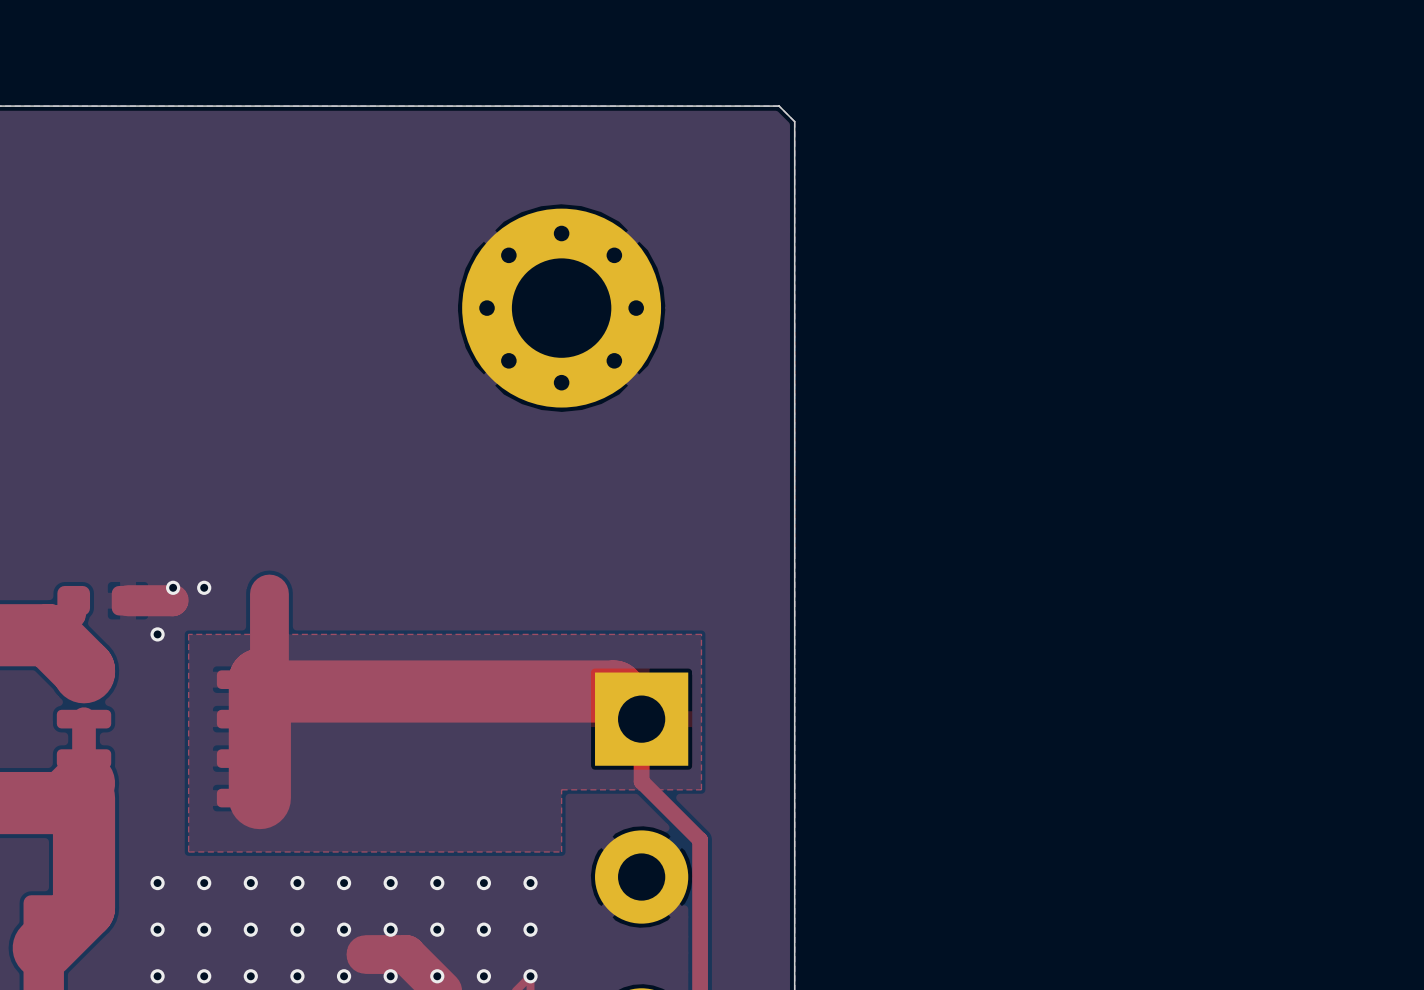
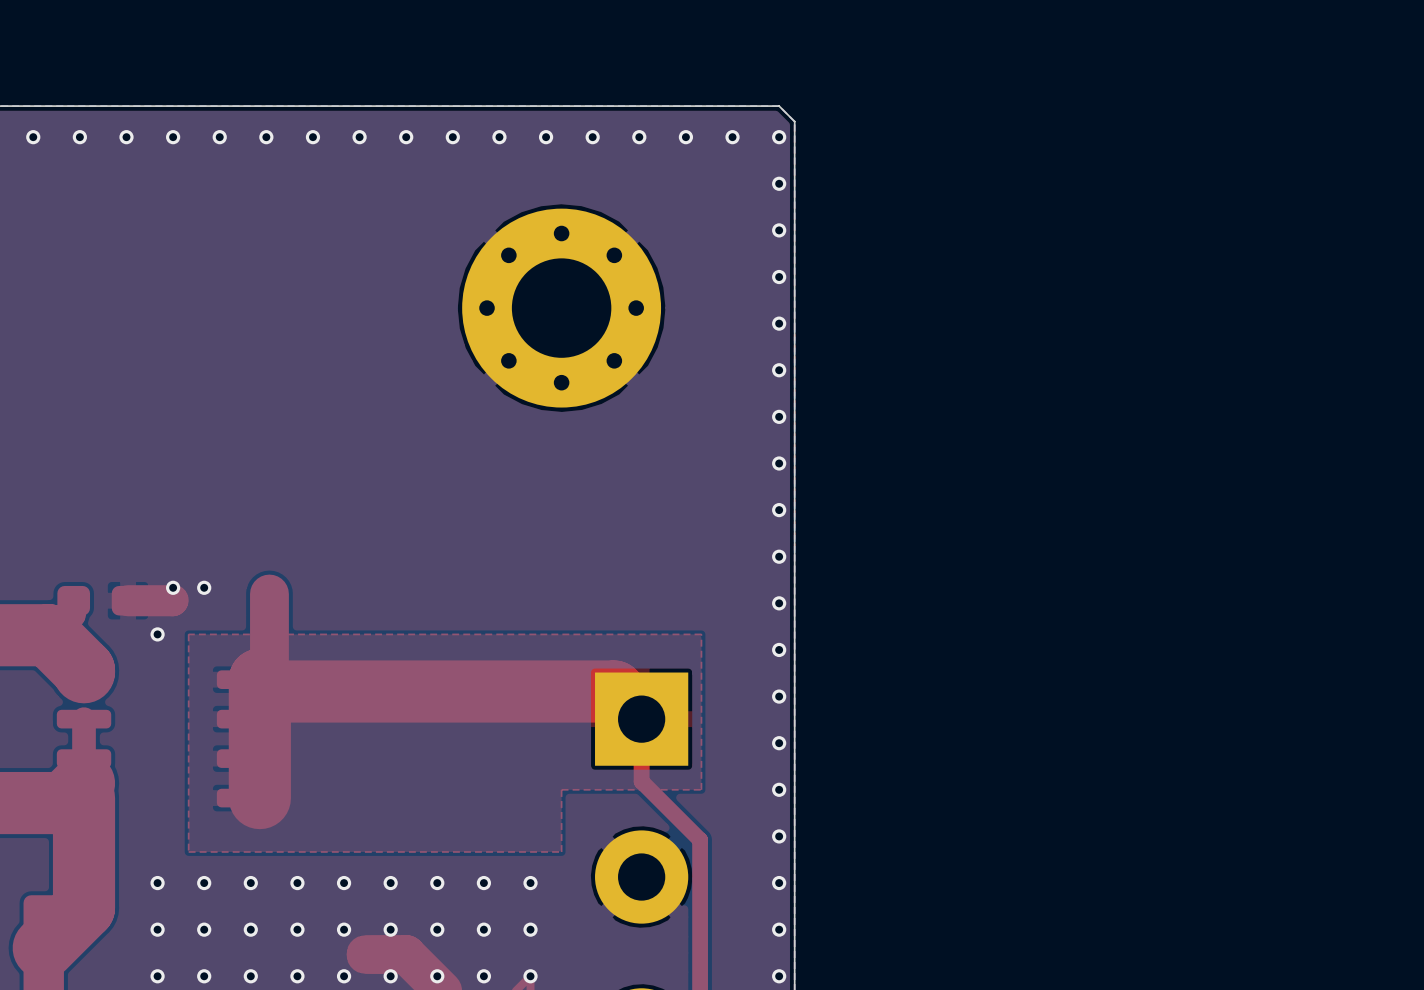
via: none -> (33, 137)
via: none -> (79, 137)
via: none -> (126, 137)
via: none -> (173, 137)
via: none -> (219, 137)
via: none -> (266, 137)
via: none -> (312, 137)
via: none -> (359, 137)
via: none -> (406, 137)
via: none -> (452, 137)
via: none -> (499, 137)
via: none -> (546, 137)
via: none -> (592, 137)
via: none -> (639, 137)
via: none -> (685, 137)
via: none -> (732, 137)
via: none -> (779, 137)
via: none -> (779, 183)
via: none -> (779, 230)
via: none -> (779, 277)
via: none -> (779, 323)
via: none -> (779, 370)
via: none -> (779, 416)
via: none -> (779, 463)
via: none -> (779, 510)
via: none -> (779, 556)
via: none -> (779, 603)
via: none -> (779, 649)
via: none -> (779, 696)
via: none -> (779, 743)
via: none -> (779, 789)
via: none -> (779, 836)
via: none -> (779, 883)
via: none -> (779, 929)
via: none -> (779, 976)

